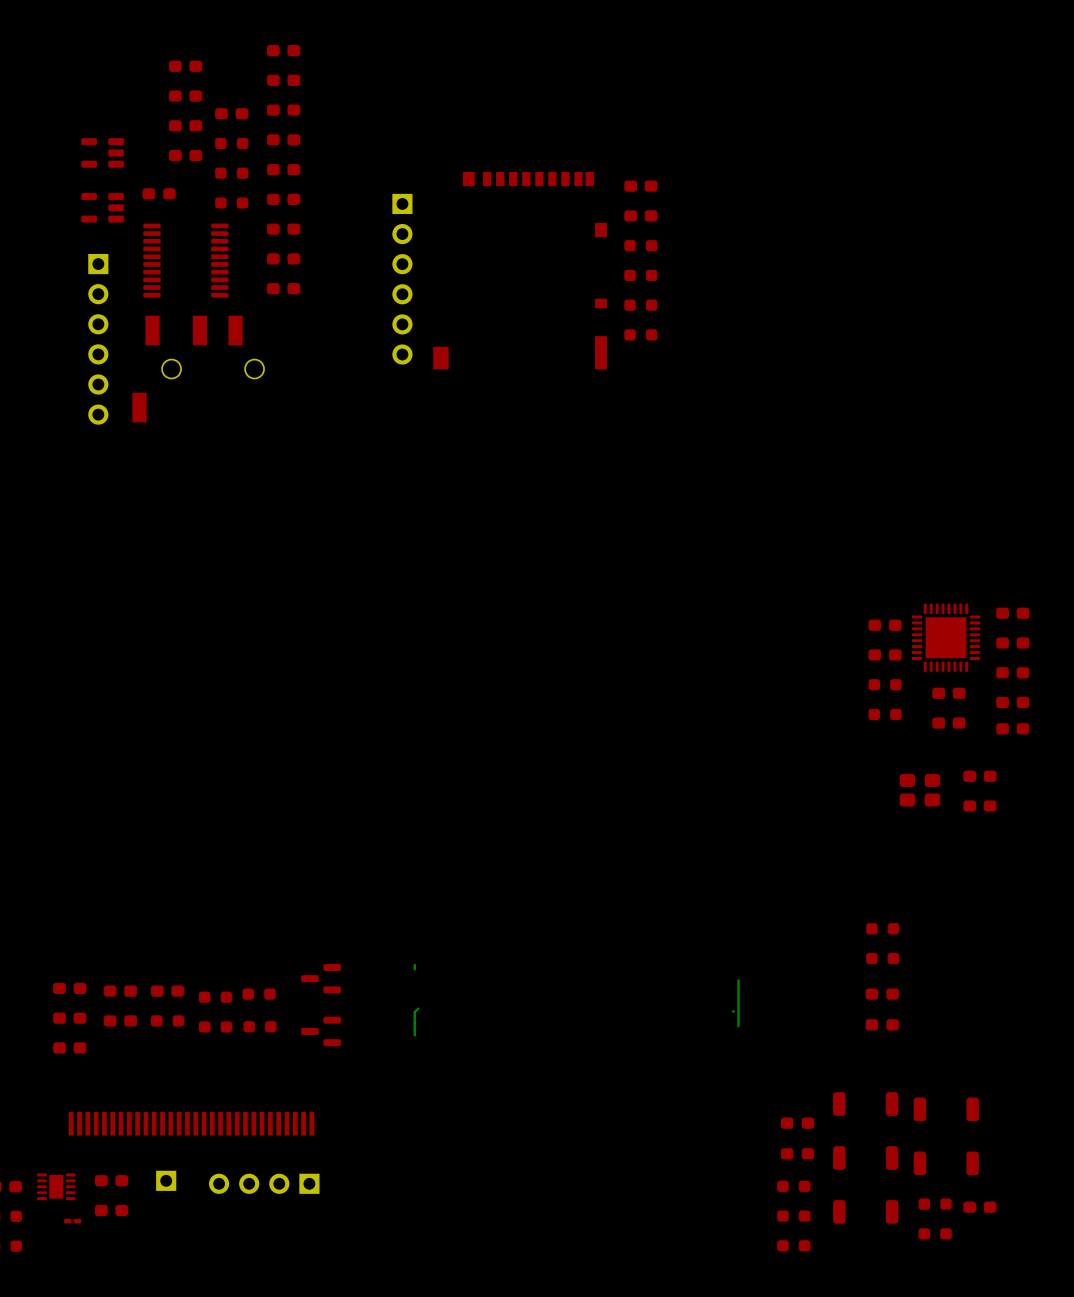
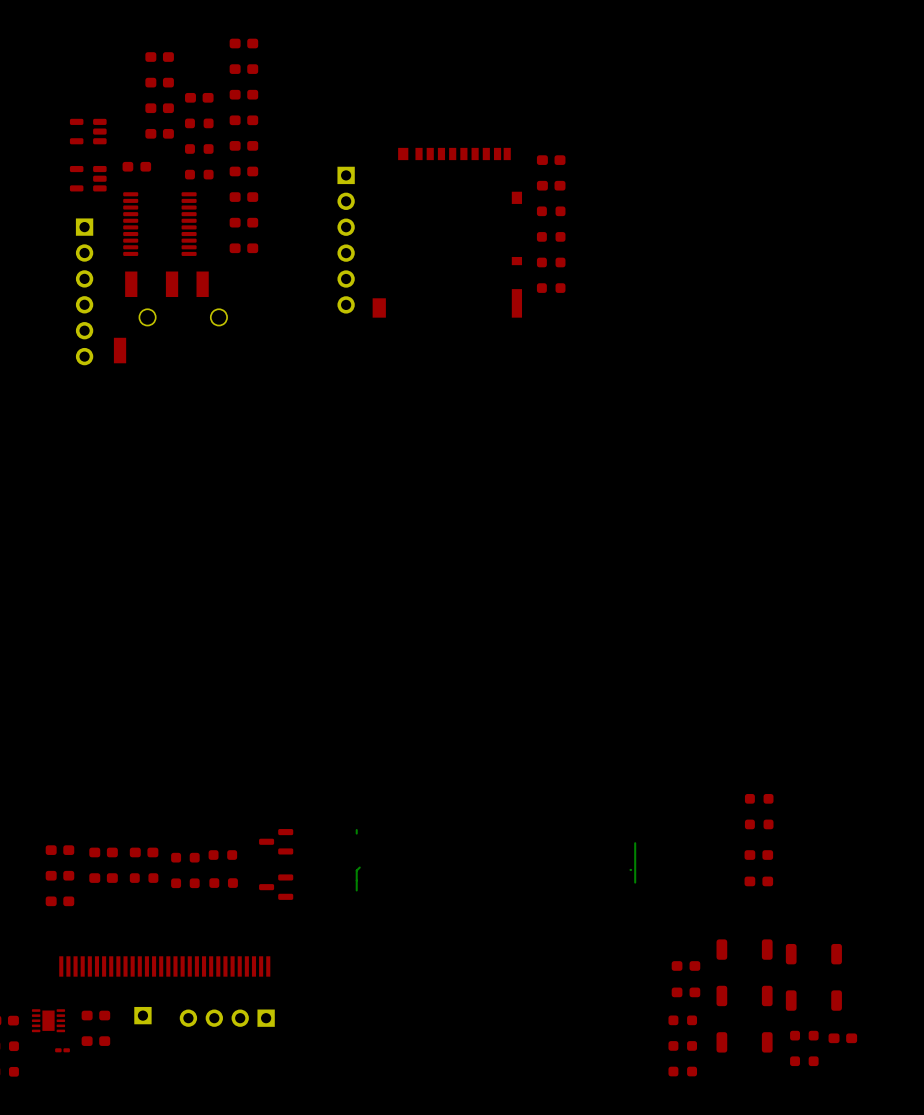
part: (1012, 613) -> none
part: (885, 625) -> none
part: (946, 637) -> none
part: (1012, 643) -> none
part: (885, 654) -> none
part: (1012, 672) -> none
part: (885, 684) -> none
part: (948, 693) -> none
part: (1012, 702) -> none
part: (885, 714) -> none
part: (948, 723) -> none
part: (1012, 728) -> none
part: (979, 776) -> none
part: (919, 790) -> none
part: (979, 806) -> none

